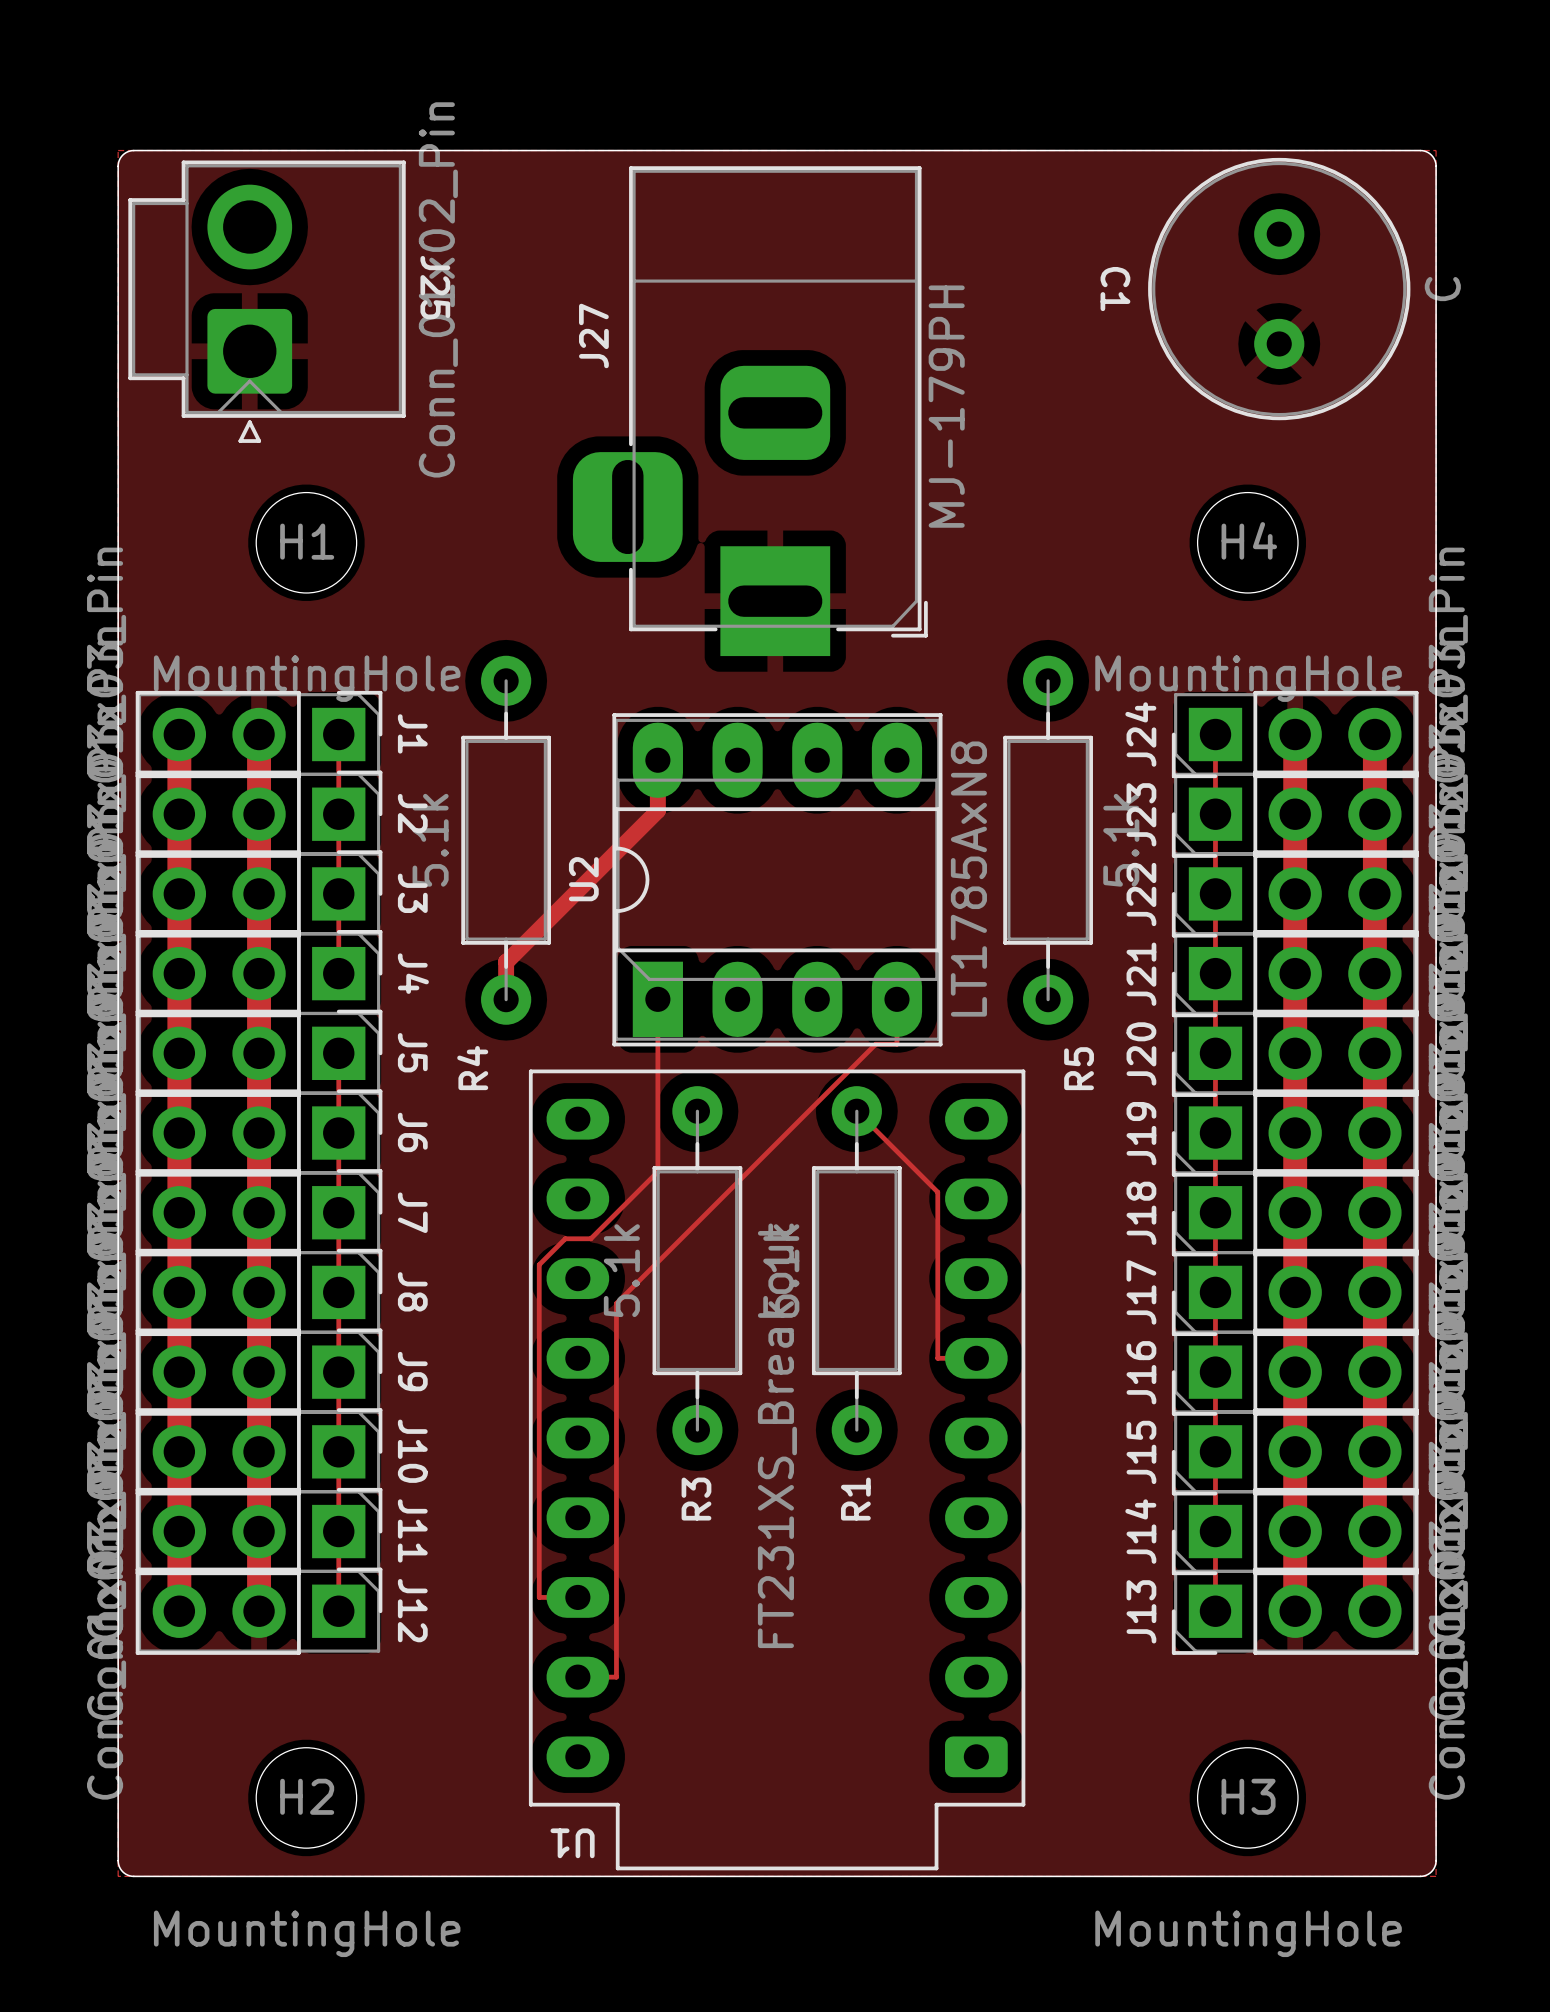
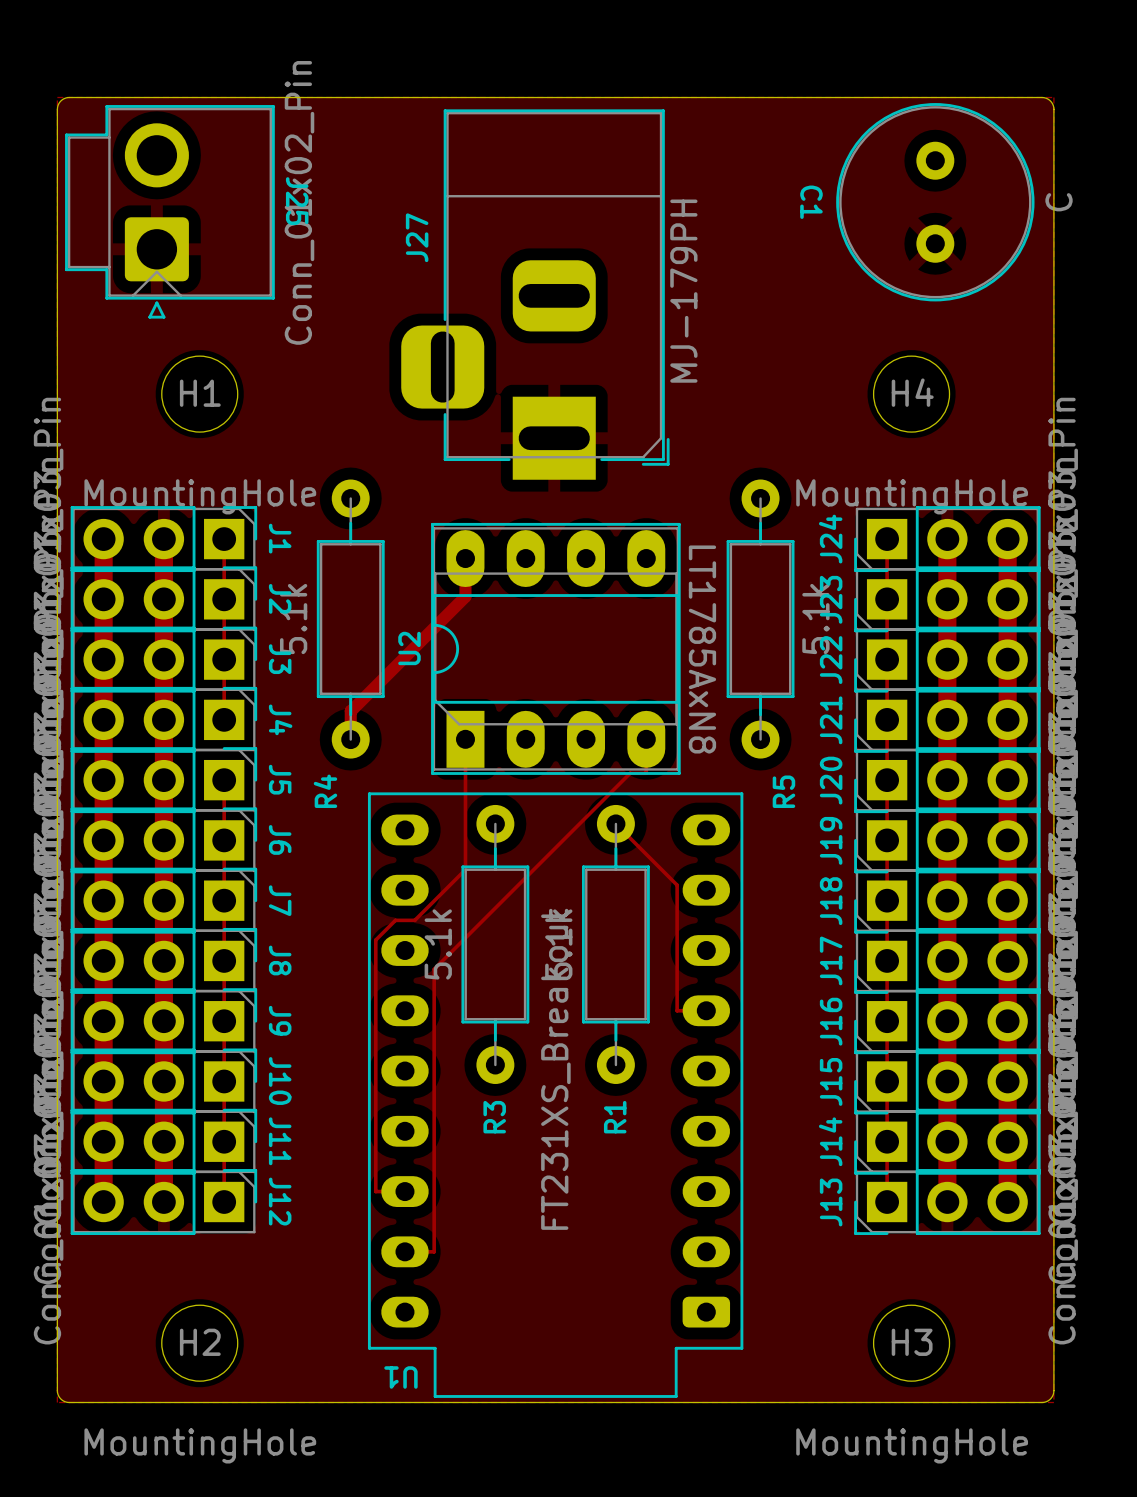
U2 value rotation: 0° (968, 879) -> 180° (702, 649)

